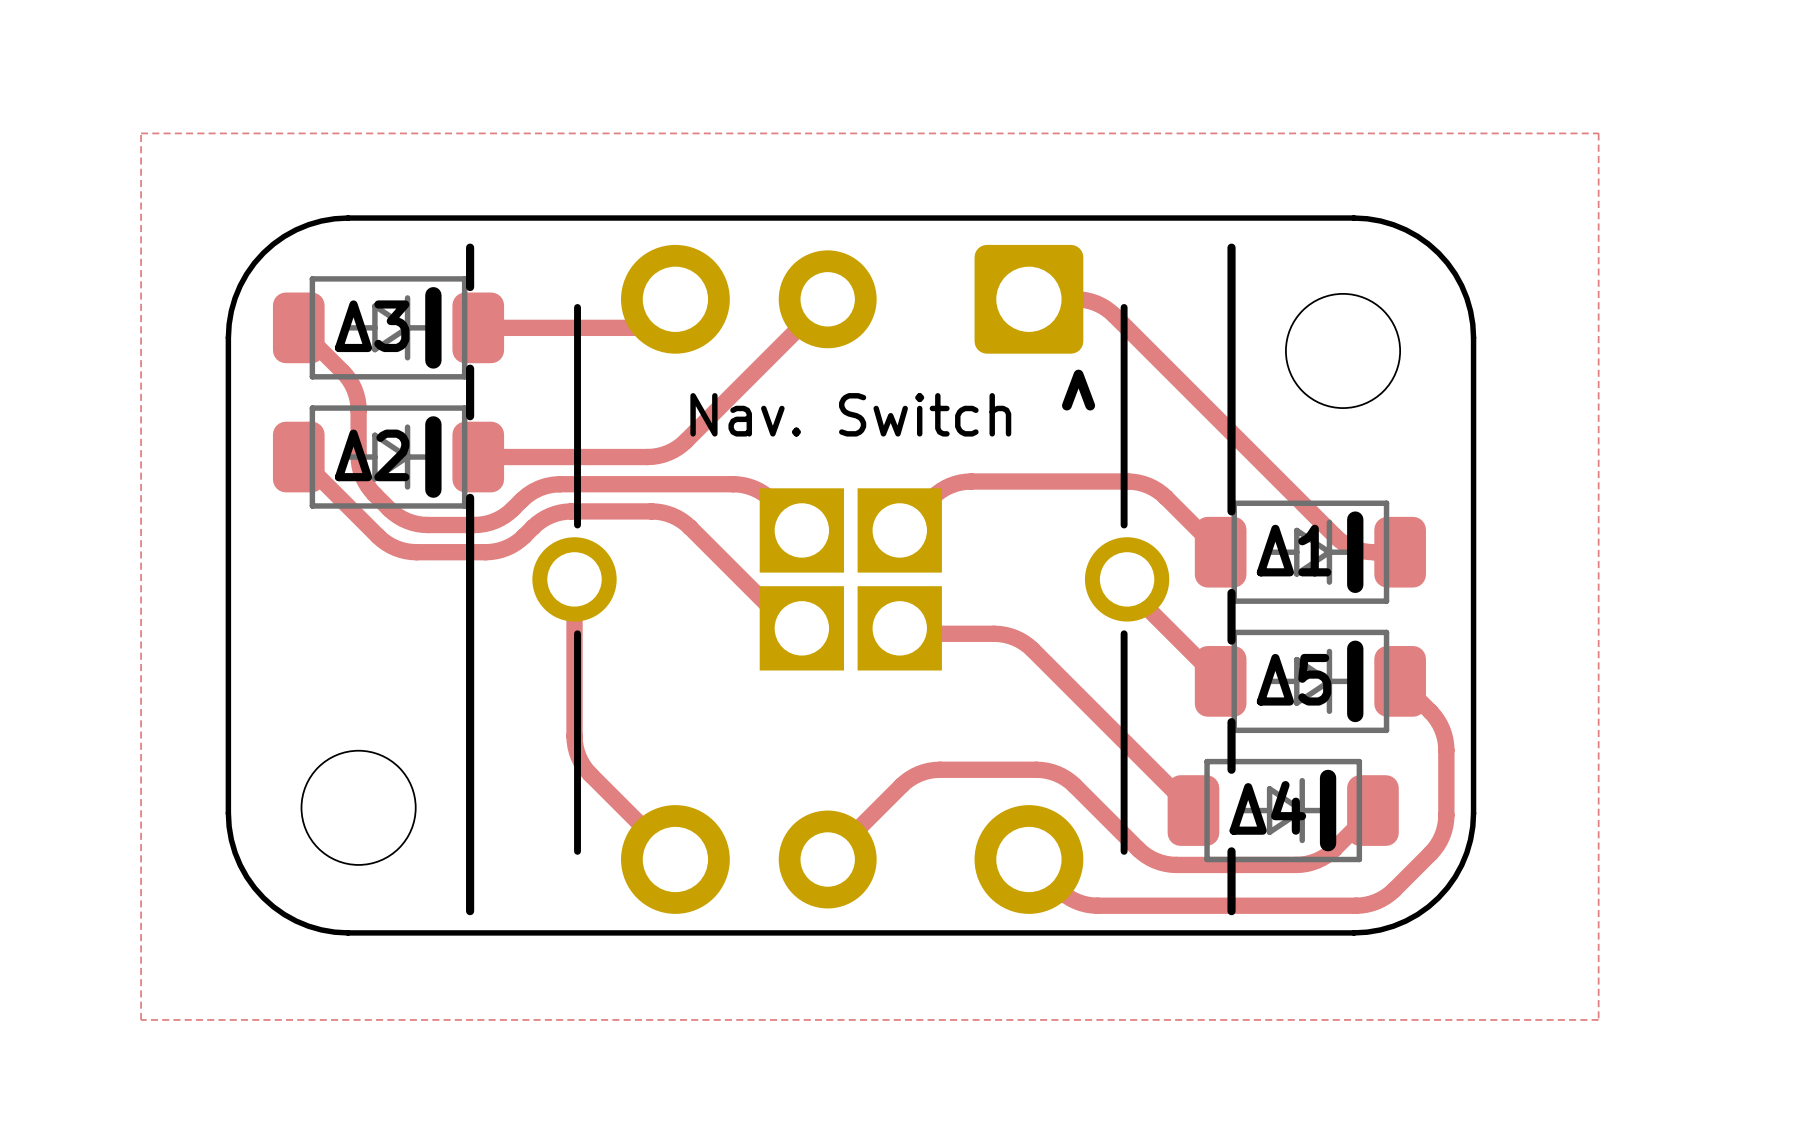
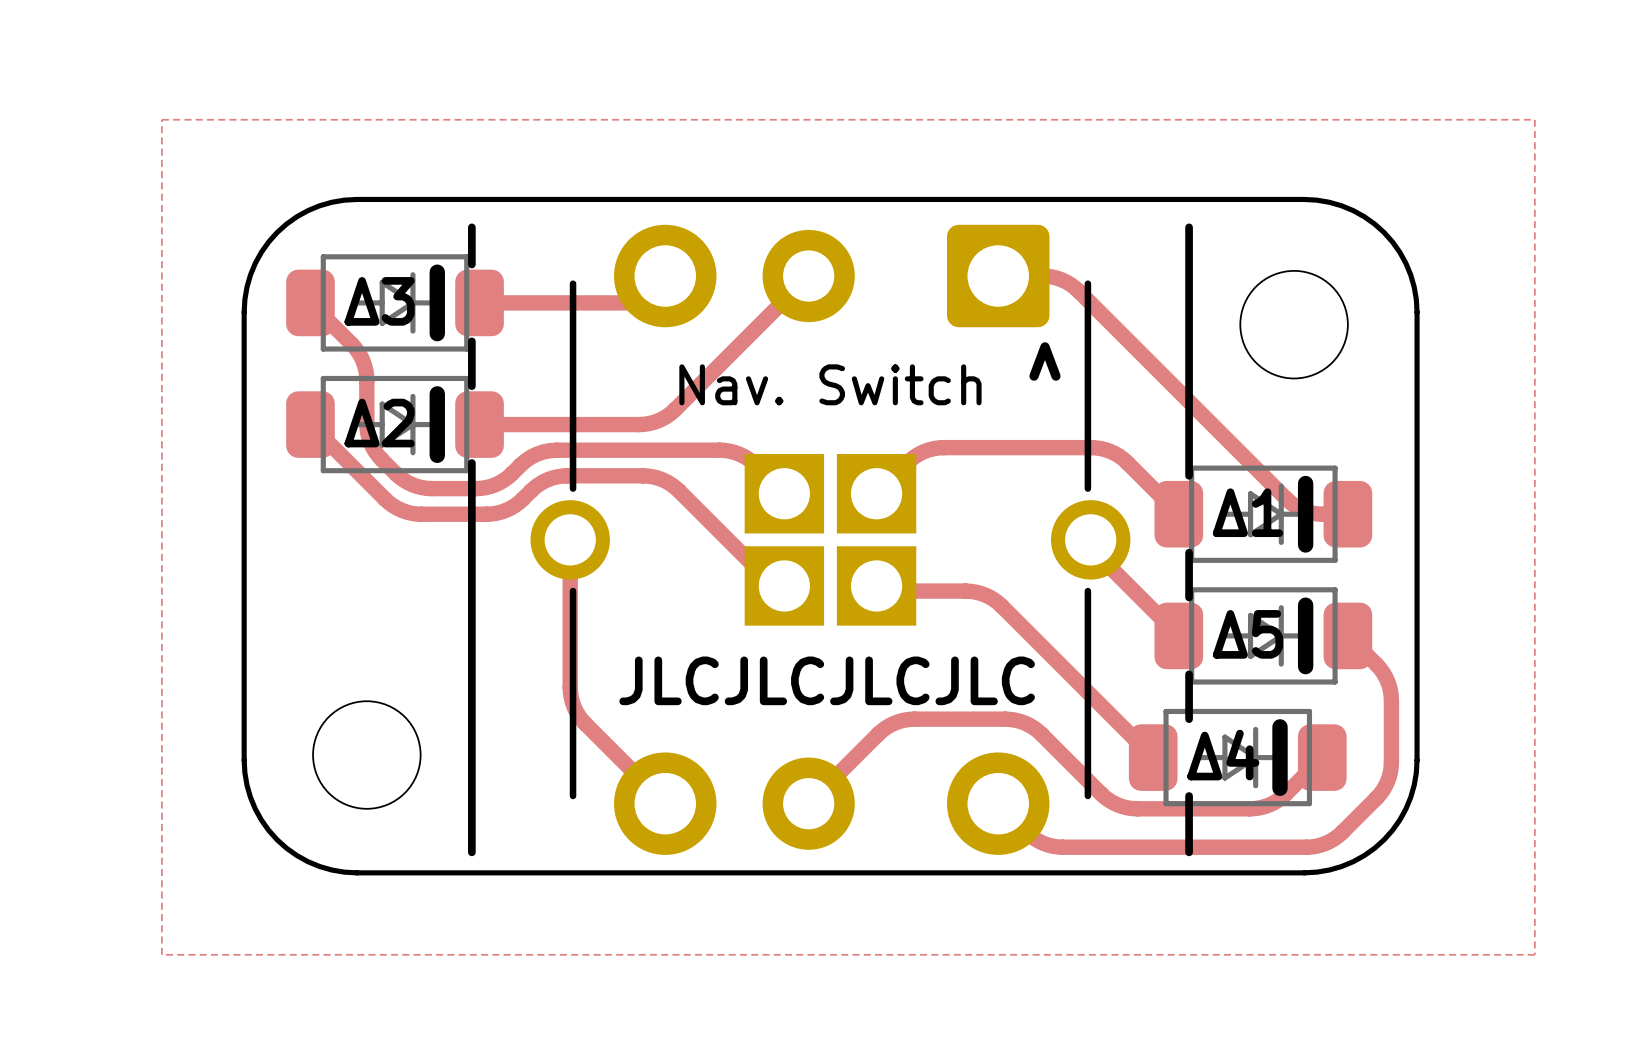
text: none -> JLCJLCJLCJLC (827, 680)

